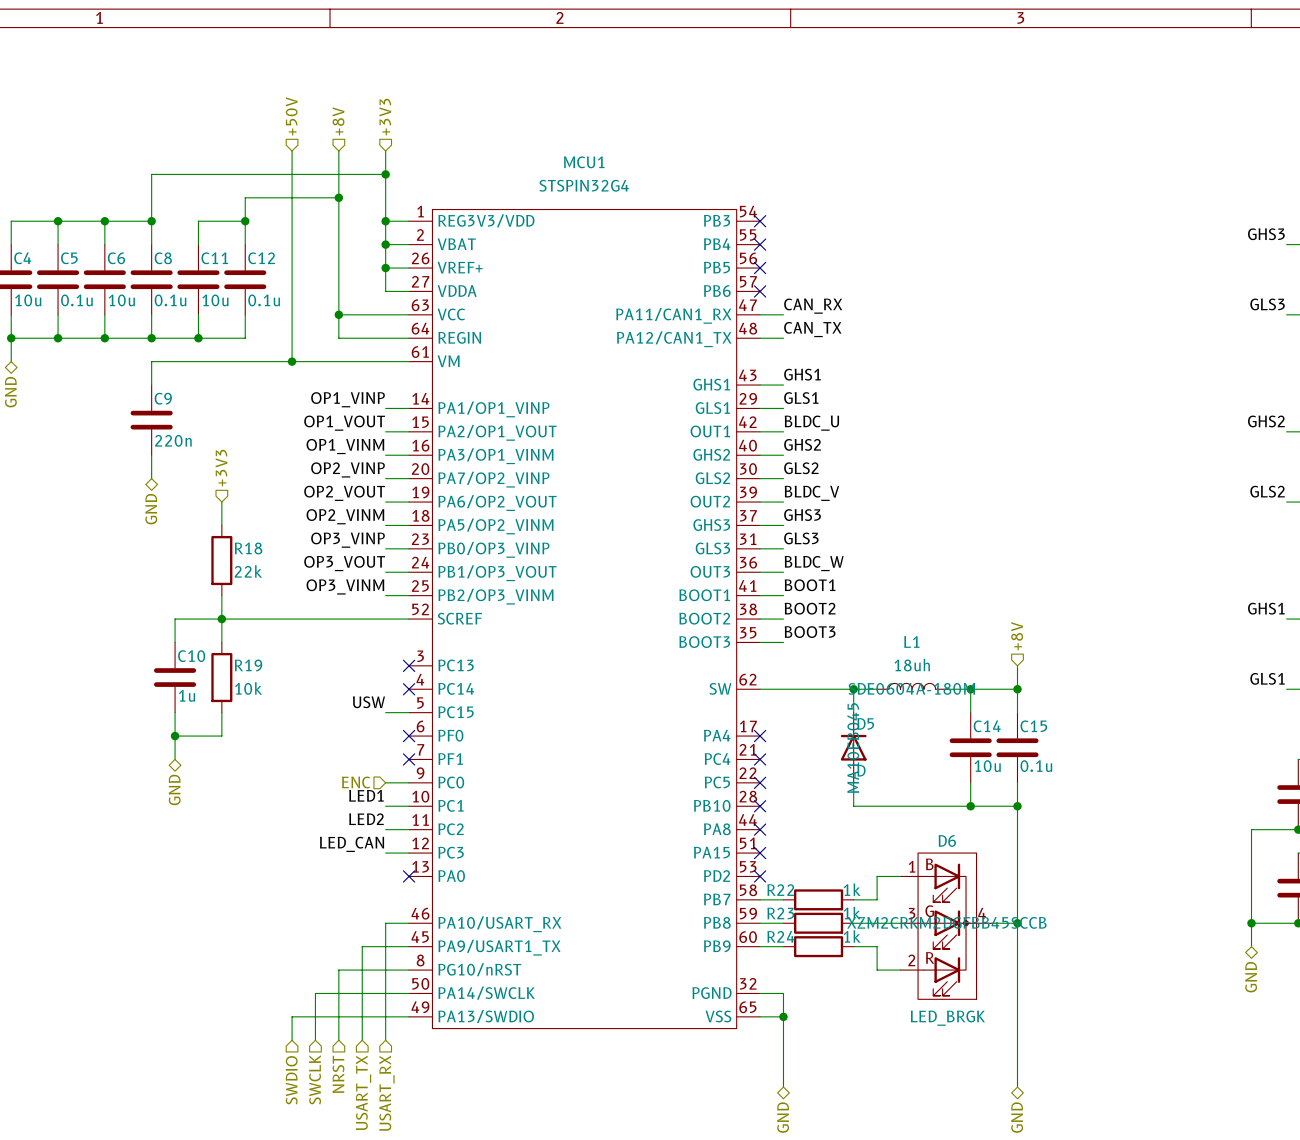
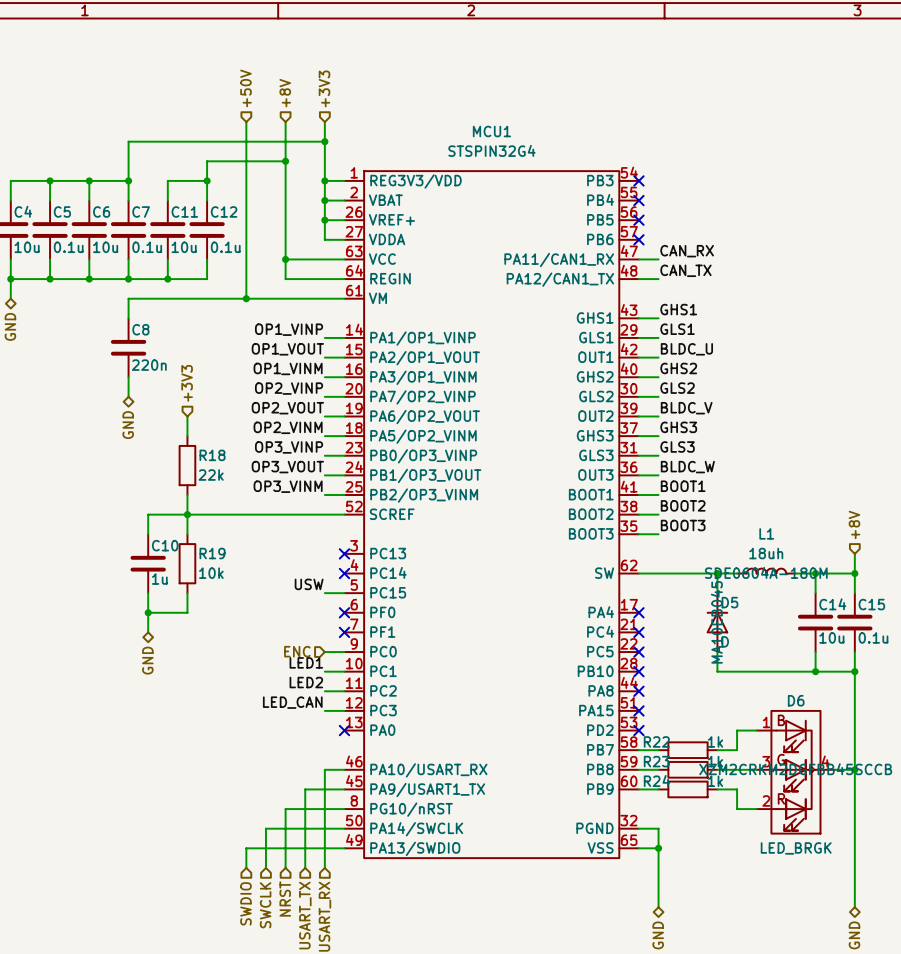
C8 name: C8 (163, 258) -> C7 (141, 211)
C9 name: C9 (163, 398) -> C8 (140, 329)

